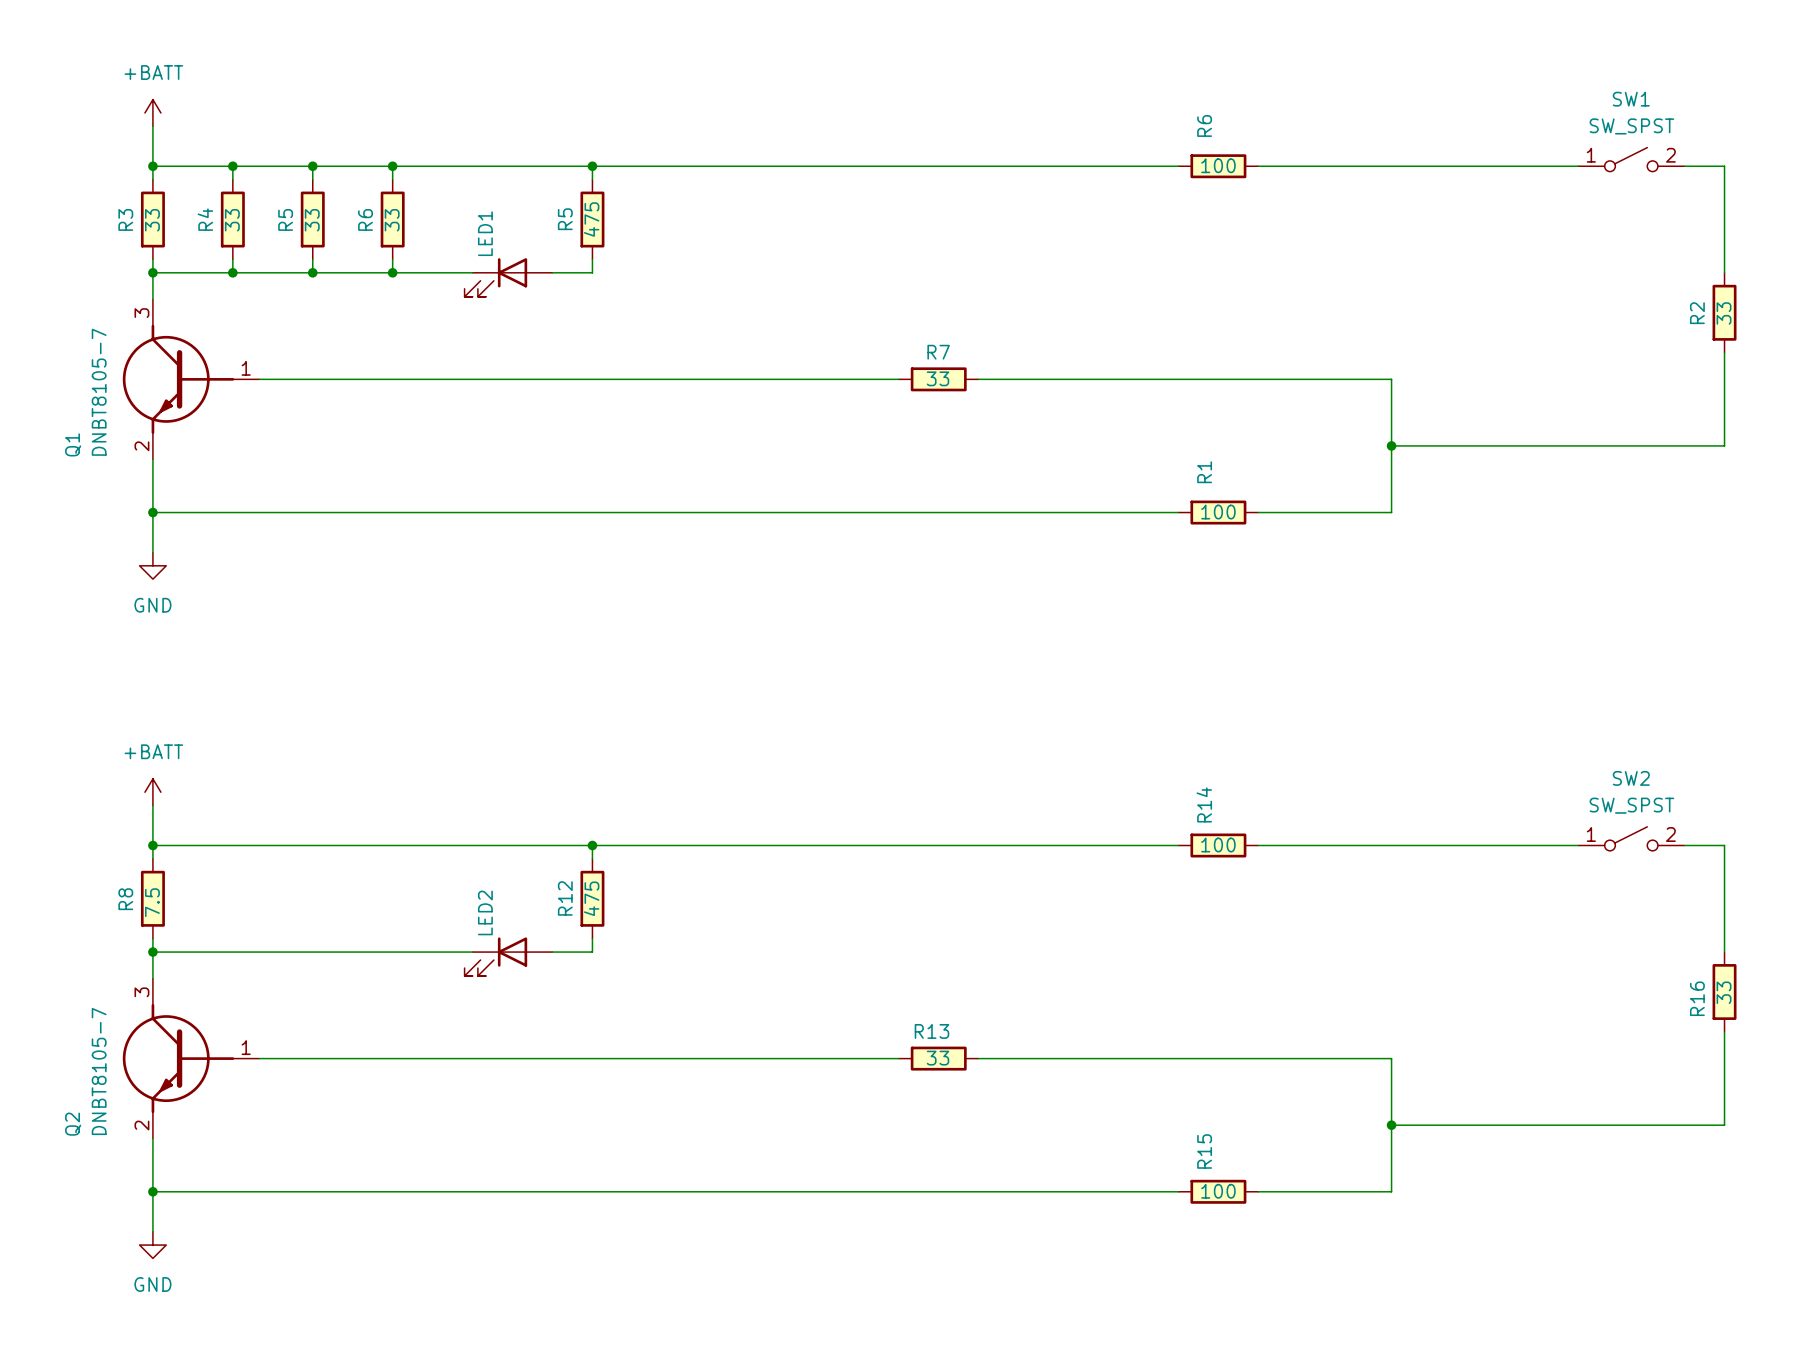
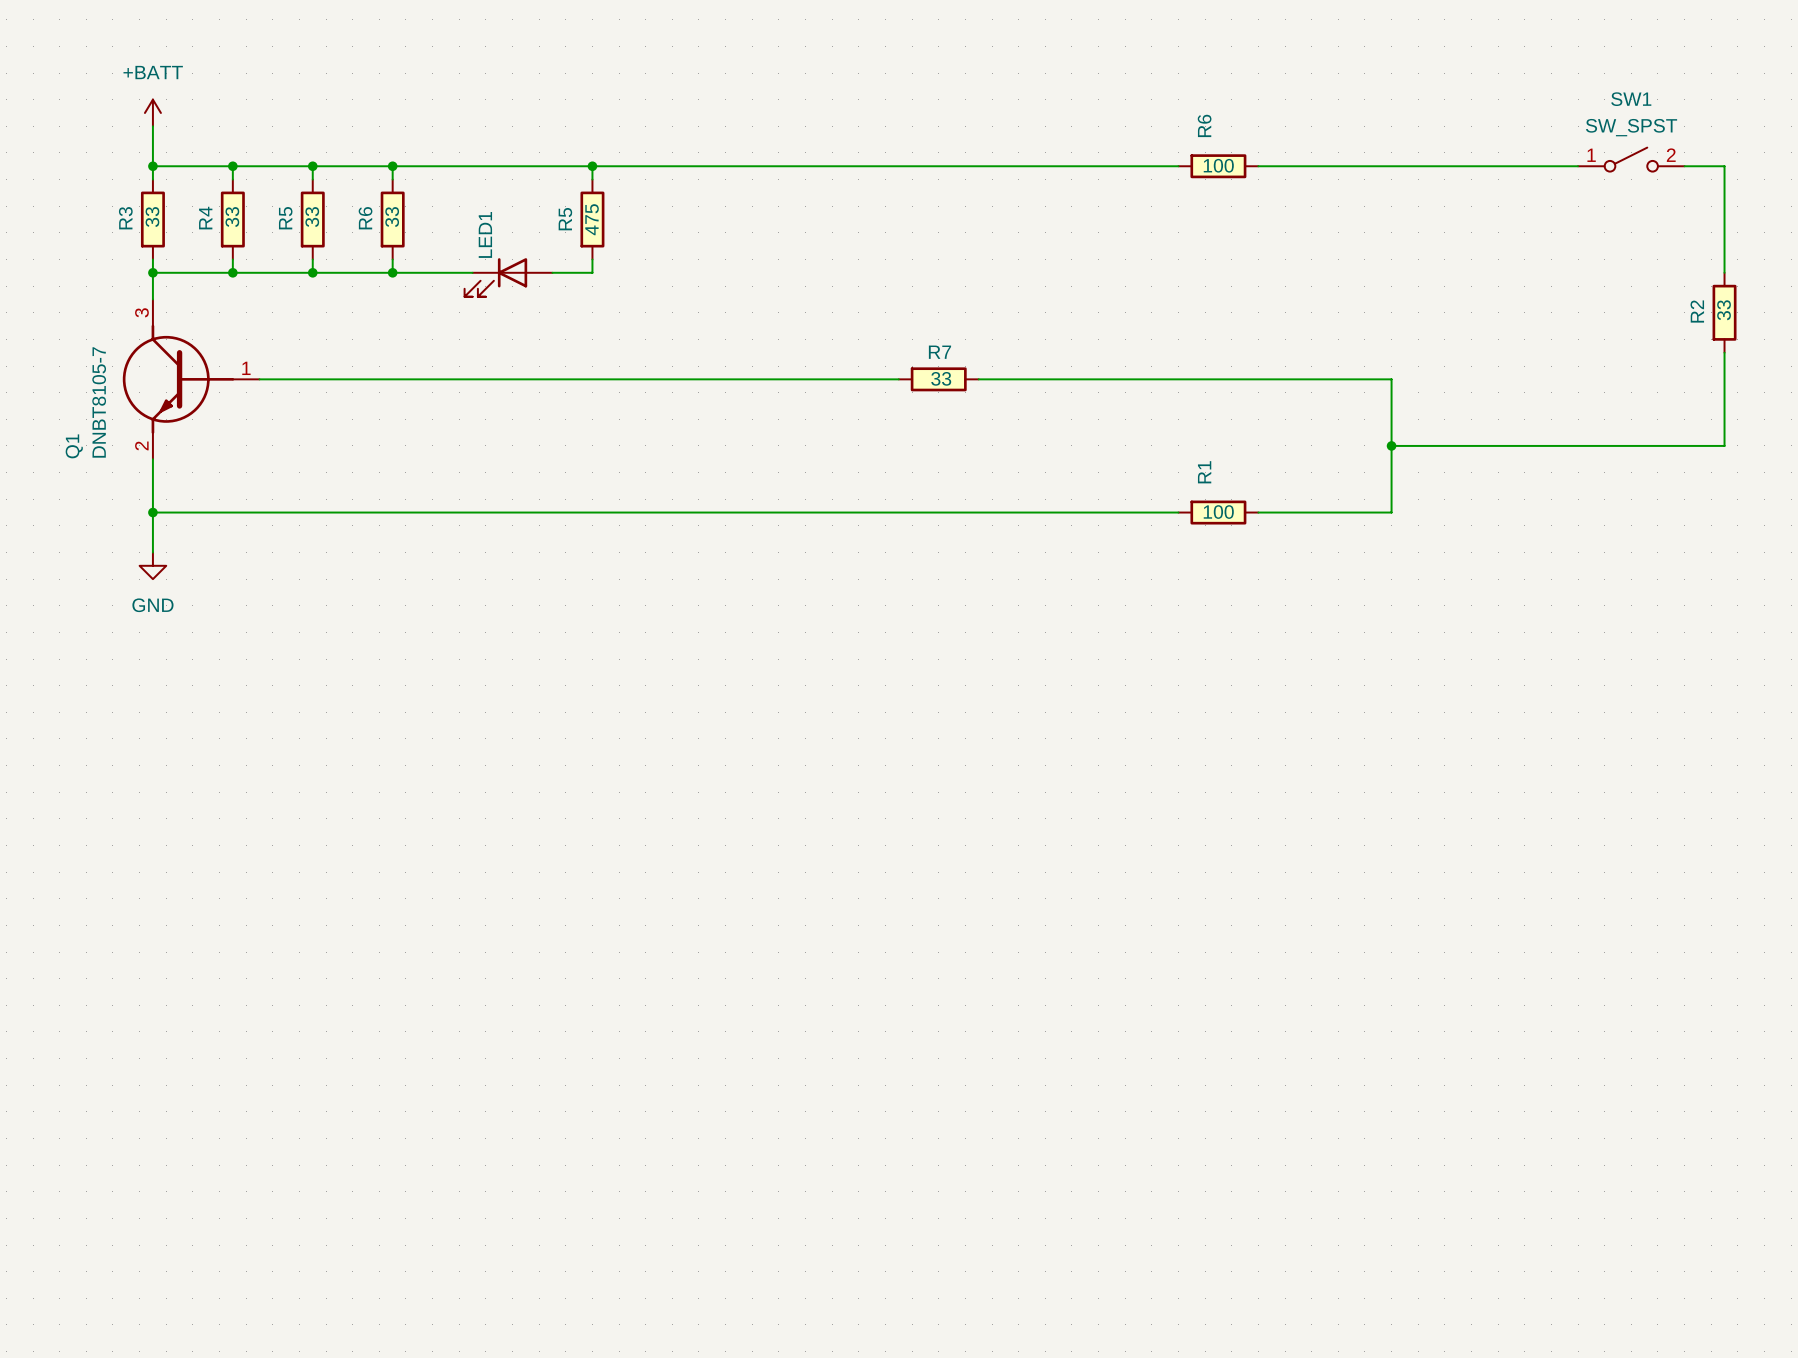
power symbol: +BATT (152, 792) -> none
wire: (152, 805) (152, 858) -> none
SW2: SW_SPST (1631, 838) -> none
wire: (152, 845) (1178, 845) -> none
junction: (152, 845) -> none
wire: (592, 845) (592, 858) -> none
junction: (592, 845) -> none
R14: 100 (1218, 845) -> none
wire: (1258, 845) (1578, 845) -> none
wire: (1684, 845) (1724, 845) (1724, 952) -> none
R8: 7.5 (152, 898) -> none
R12: 475 (592, 898) -> none
wire: (152, 938) (152, 978) -> none
wire: (592, 938) (592, 952) (552, 952) -> none
wire: (152, 952) (472, 952) -> none
junction: (152, 952) -> none
LED2: (508, 956) -> none
R16: 33 (1724, 992) -> none
wire: (1724, 1031) (1724, 1125) (1391, 1125) -> none
Q2: DNBT8105-7 (191, 1058) -> none
wire: (259, 1058) (898, 1058) -> none
R13: 33 (938, 1058) -> none
wire: (978, 1058) (1391, 1058) (1391, 1191) (1258, 1191) -> none
junction: (1391, 1125) -> none
wire: (152, 1138) (152, 1231) -> none
wire: (152, 1191) (1178, 1191) -> none
junction: (152, 1191) -> none
R15: 100 (1218, 1191) -> none
power symbol: GND (152, 1245) -> none

